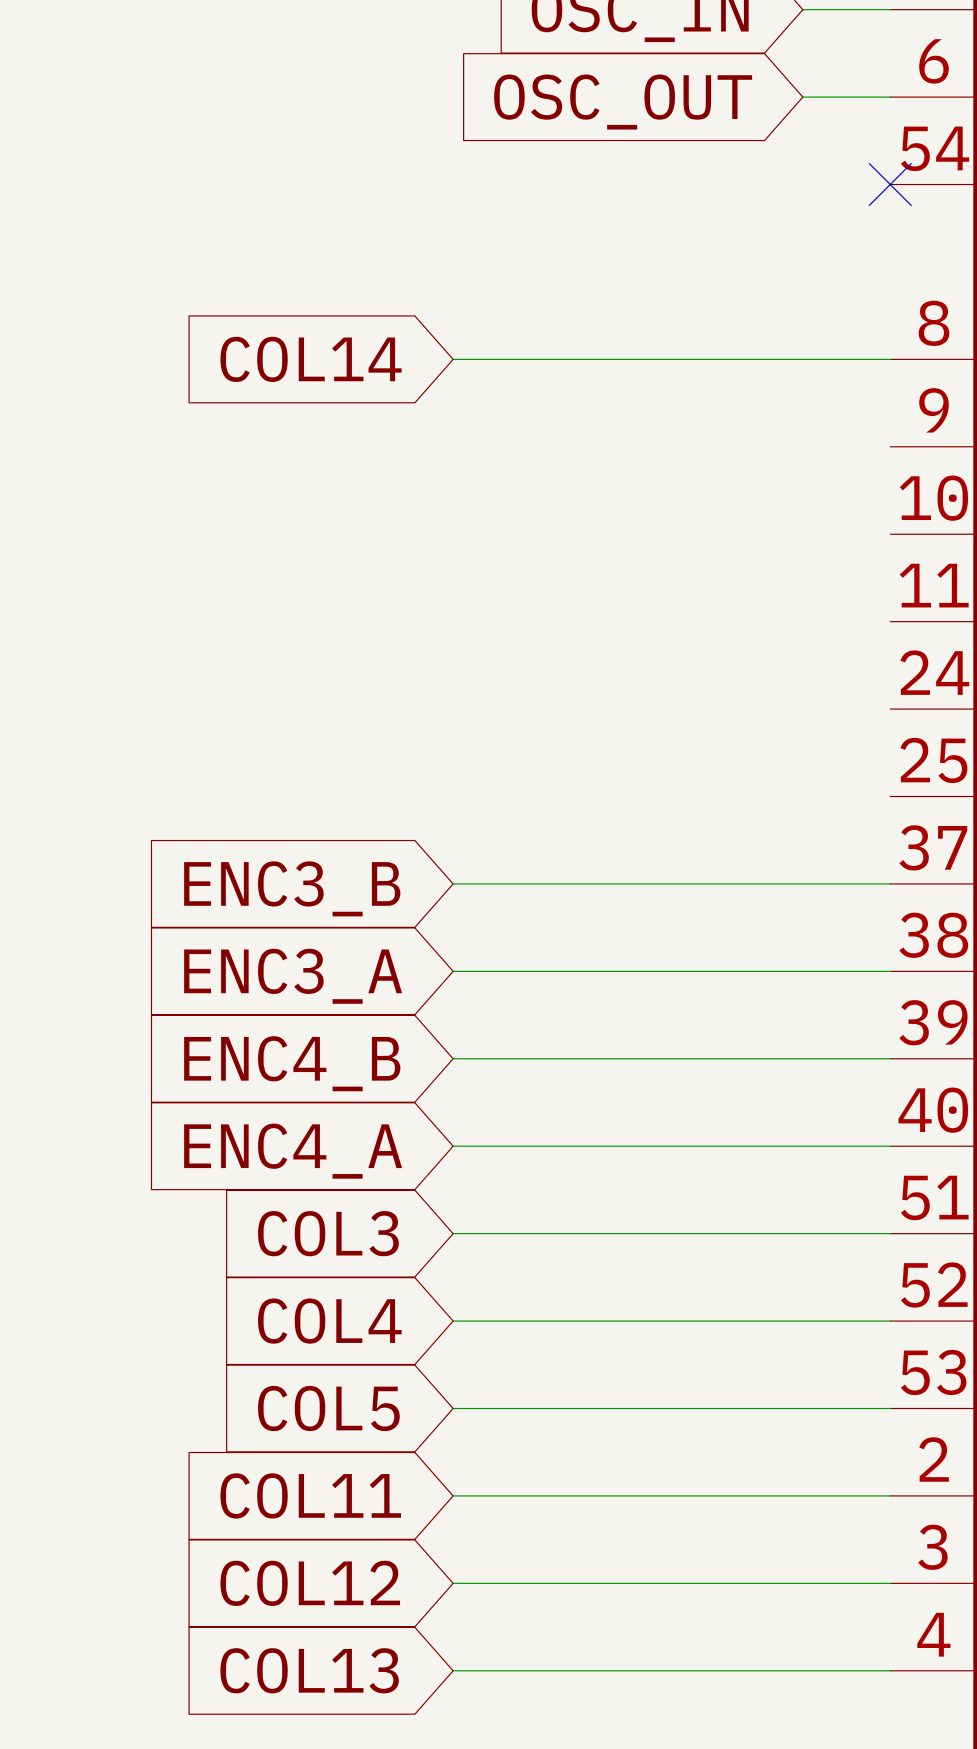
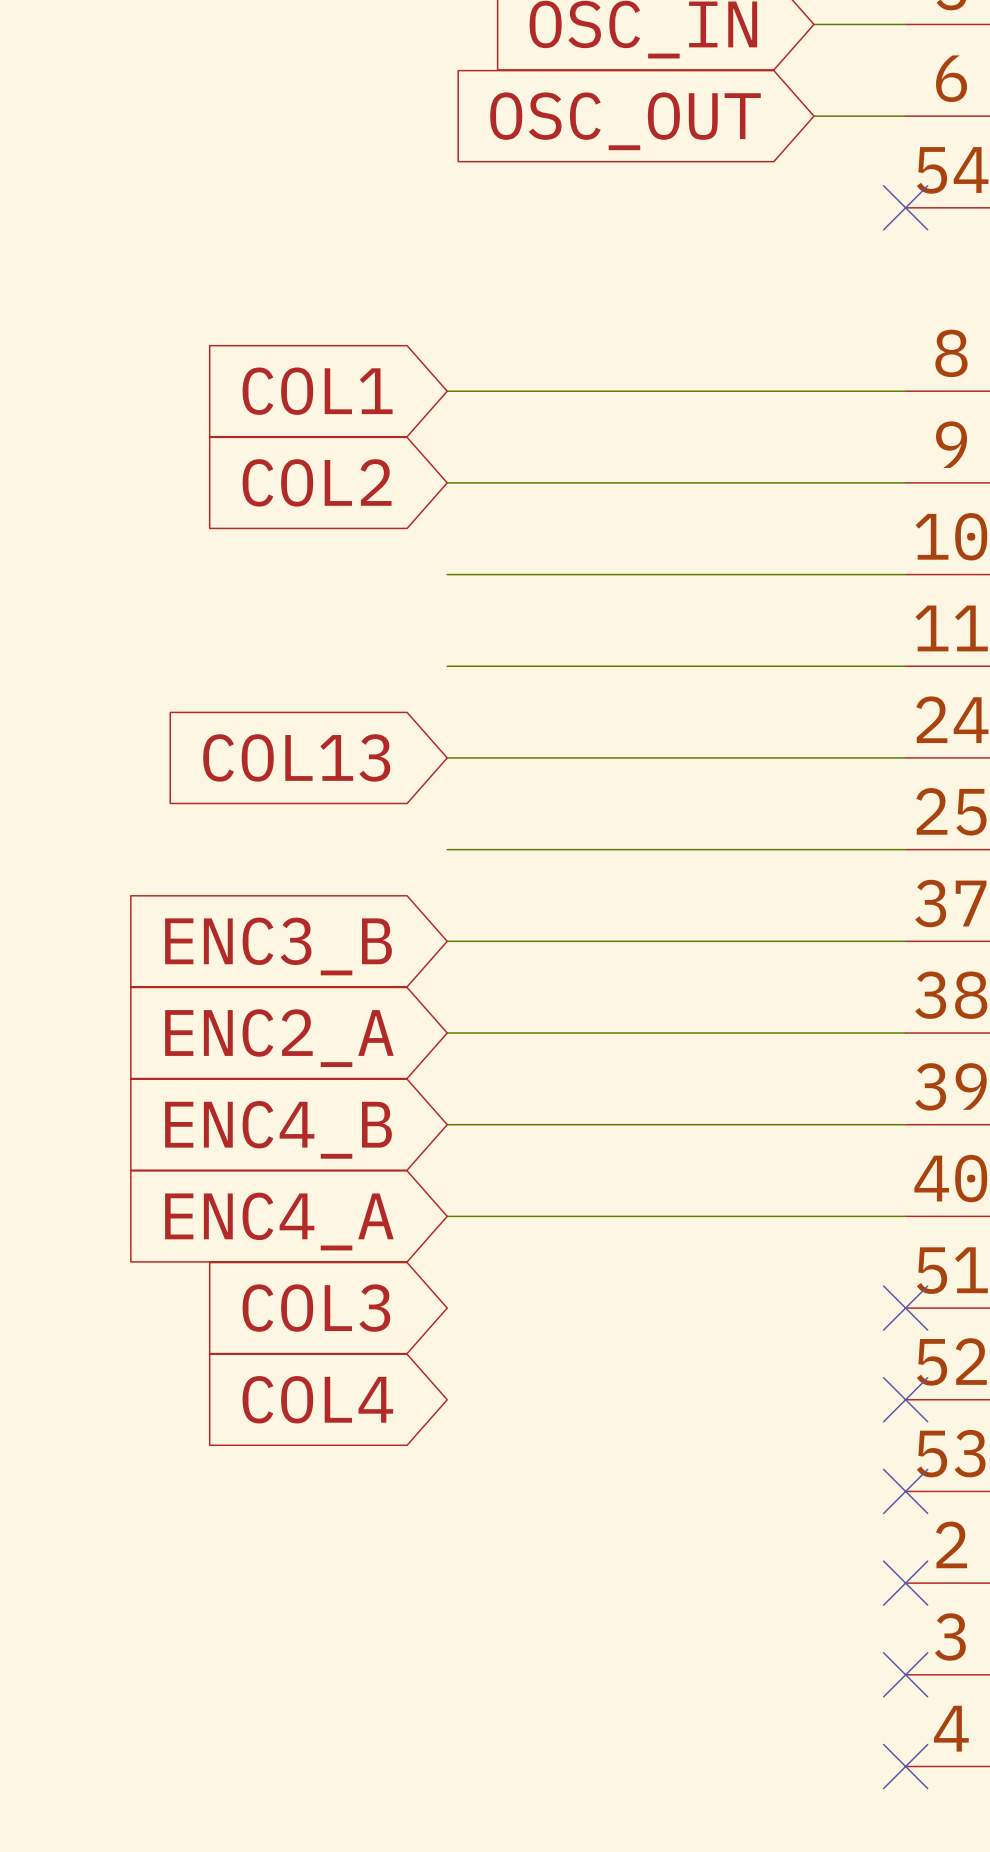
global label: COL14 (311, 359) -> COL1 (317, 391)
global label: none -> COL2 (317, 482)
global label: none -> COL13 (296, 757)
global label: ENC3_A (293, 976) -> ENC2_A (279, 1038)
wire: (453, 1233) (890, 1233) -> (447, 482) (905, 482)
no-connect mark: none -> (905, 1308)
wire: (453, 1321) (890, 1321) -> (447, 574) (905, 574)
no-connect mark: none -> (905, 1399)
global label: COL5 (328, 1408) -> none
wire: (453, 1408) (890, 1408) -> (447, 666) (905, 666)
no-connect mark: none -> (905, 1491)
global label: COL11 (310, 1495) -> none
wire: (453, 1495) (890, 1495) -> (447, 757) (905, 757)
no-connect mark: none -> (905, 1583)
global label: COL12 (310, 1583) -> none
wire: (453, 1583) (890, 1583) -> (447, 849) (905, 849)
no-connect mark: none -> (905, 1674)
global label: COL13 (309, 1670) -> none
wire: (453, 1670) (890, 1670) -> none
no-connect mark: none -> (905, 1766)

